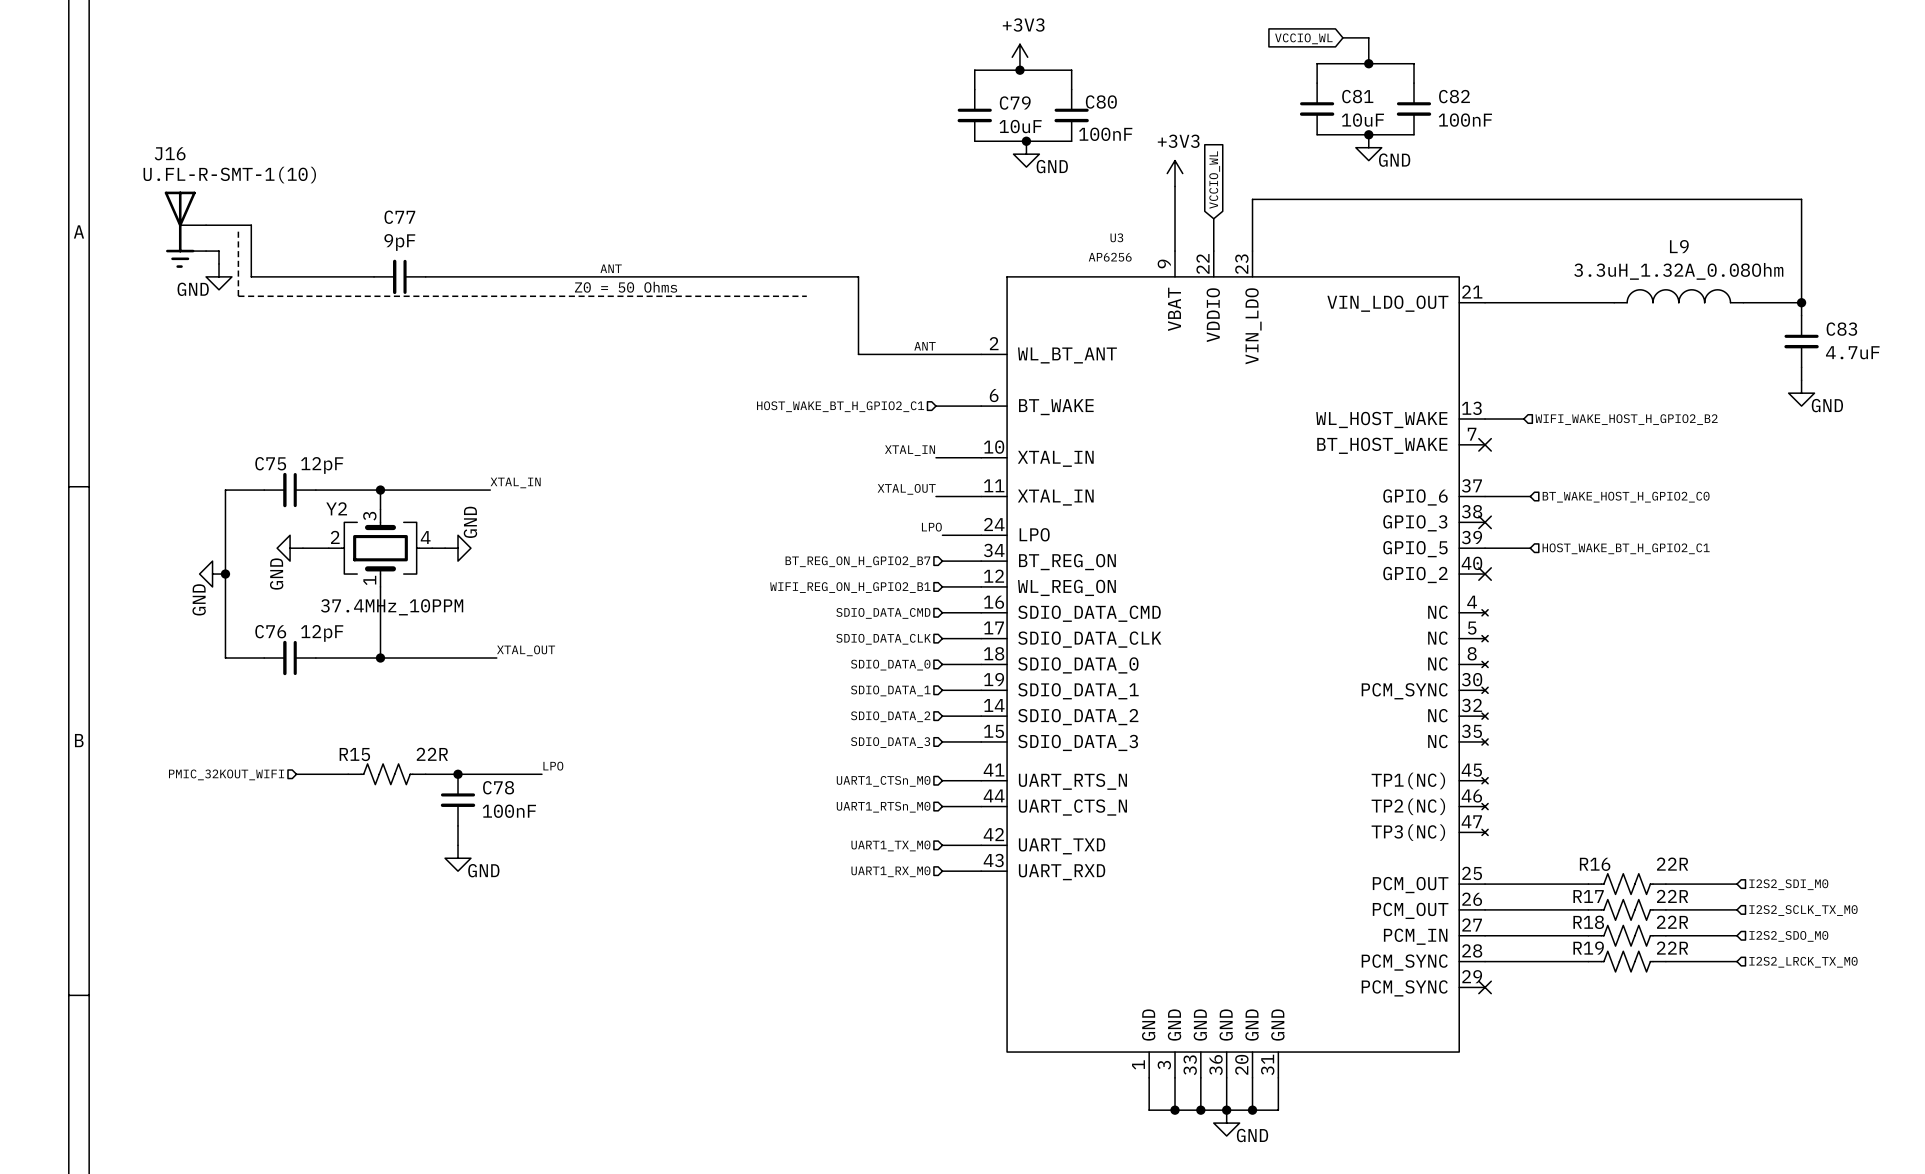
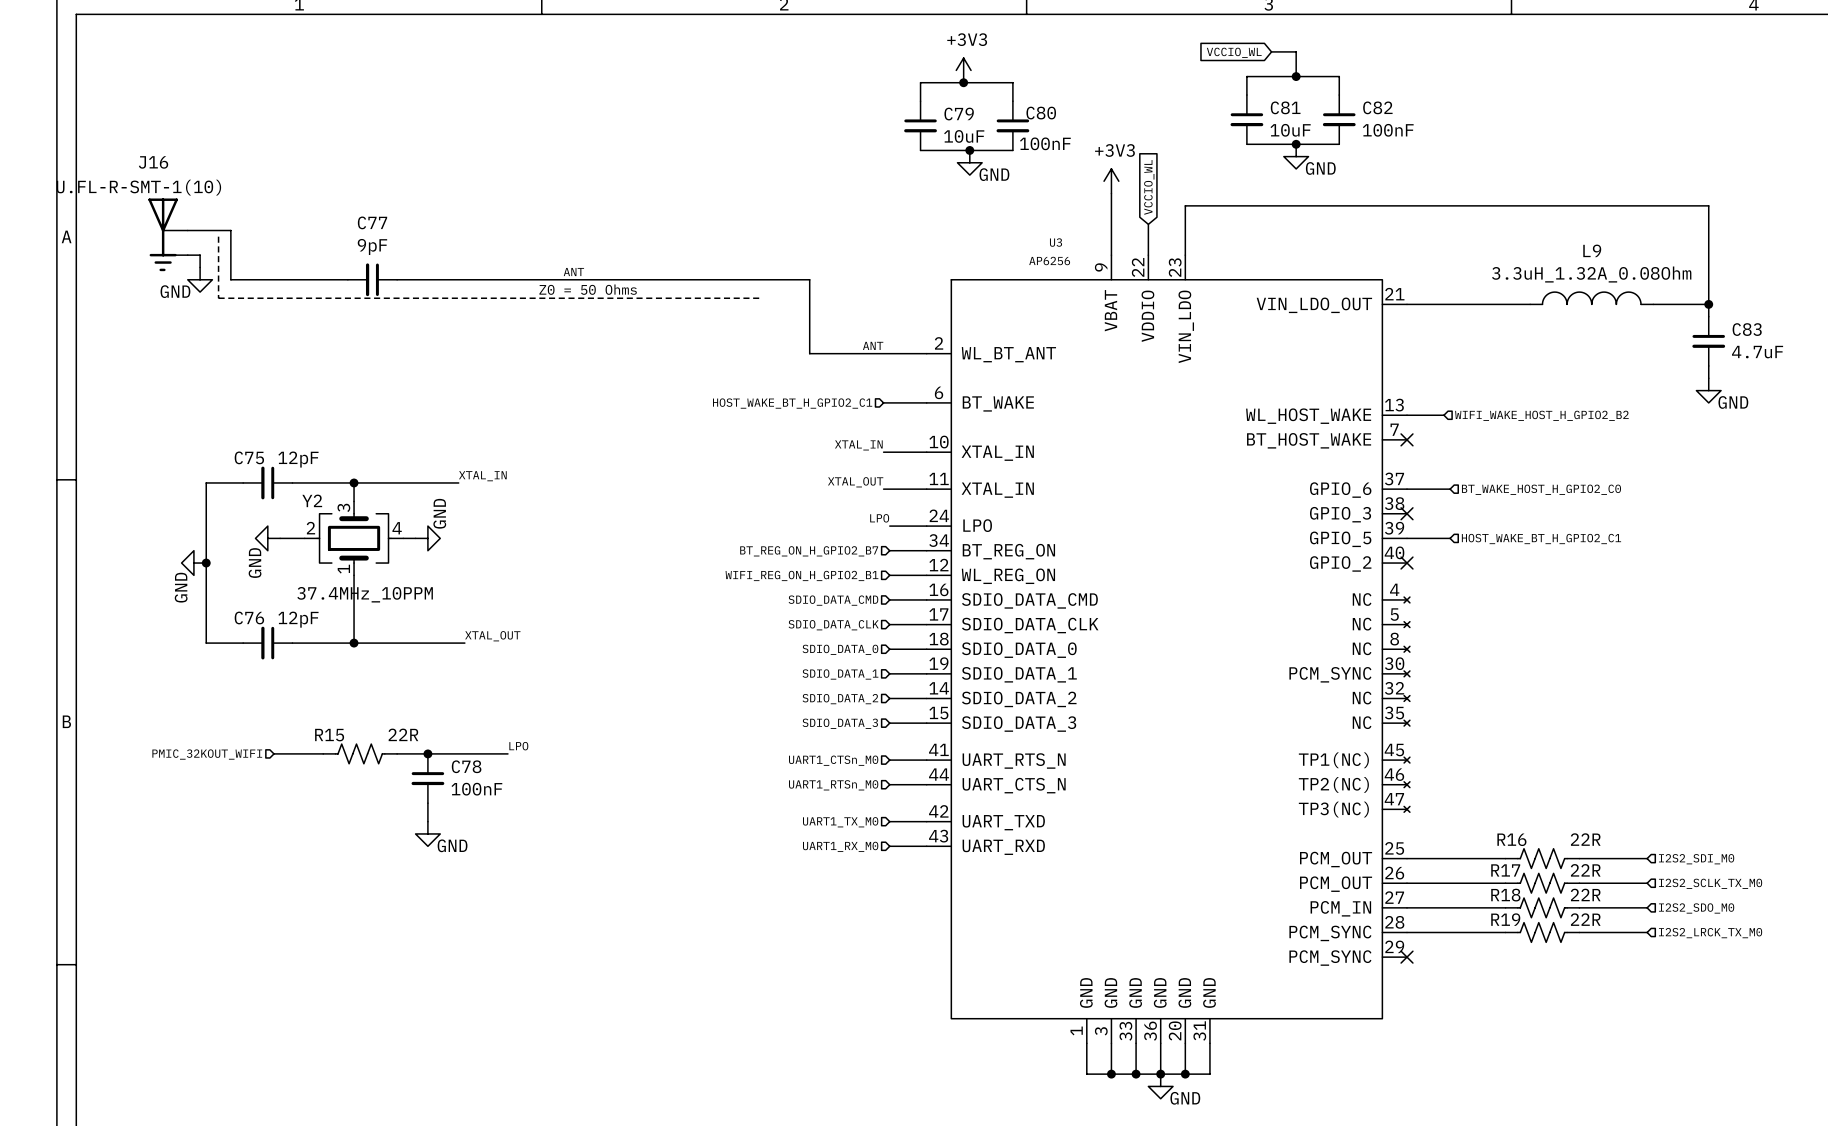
J16 value position: U.FL-R-SMT-1(10) (229, 175) -> U.FL-R-SMT-1(10) (138, 187)

